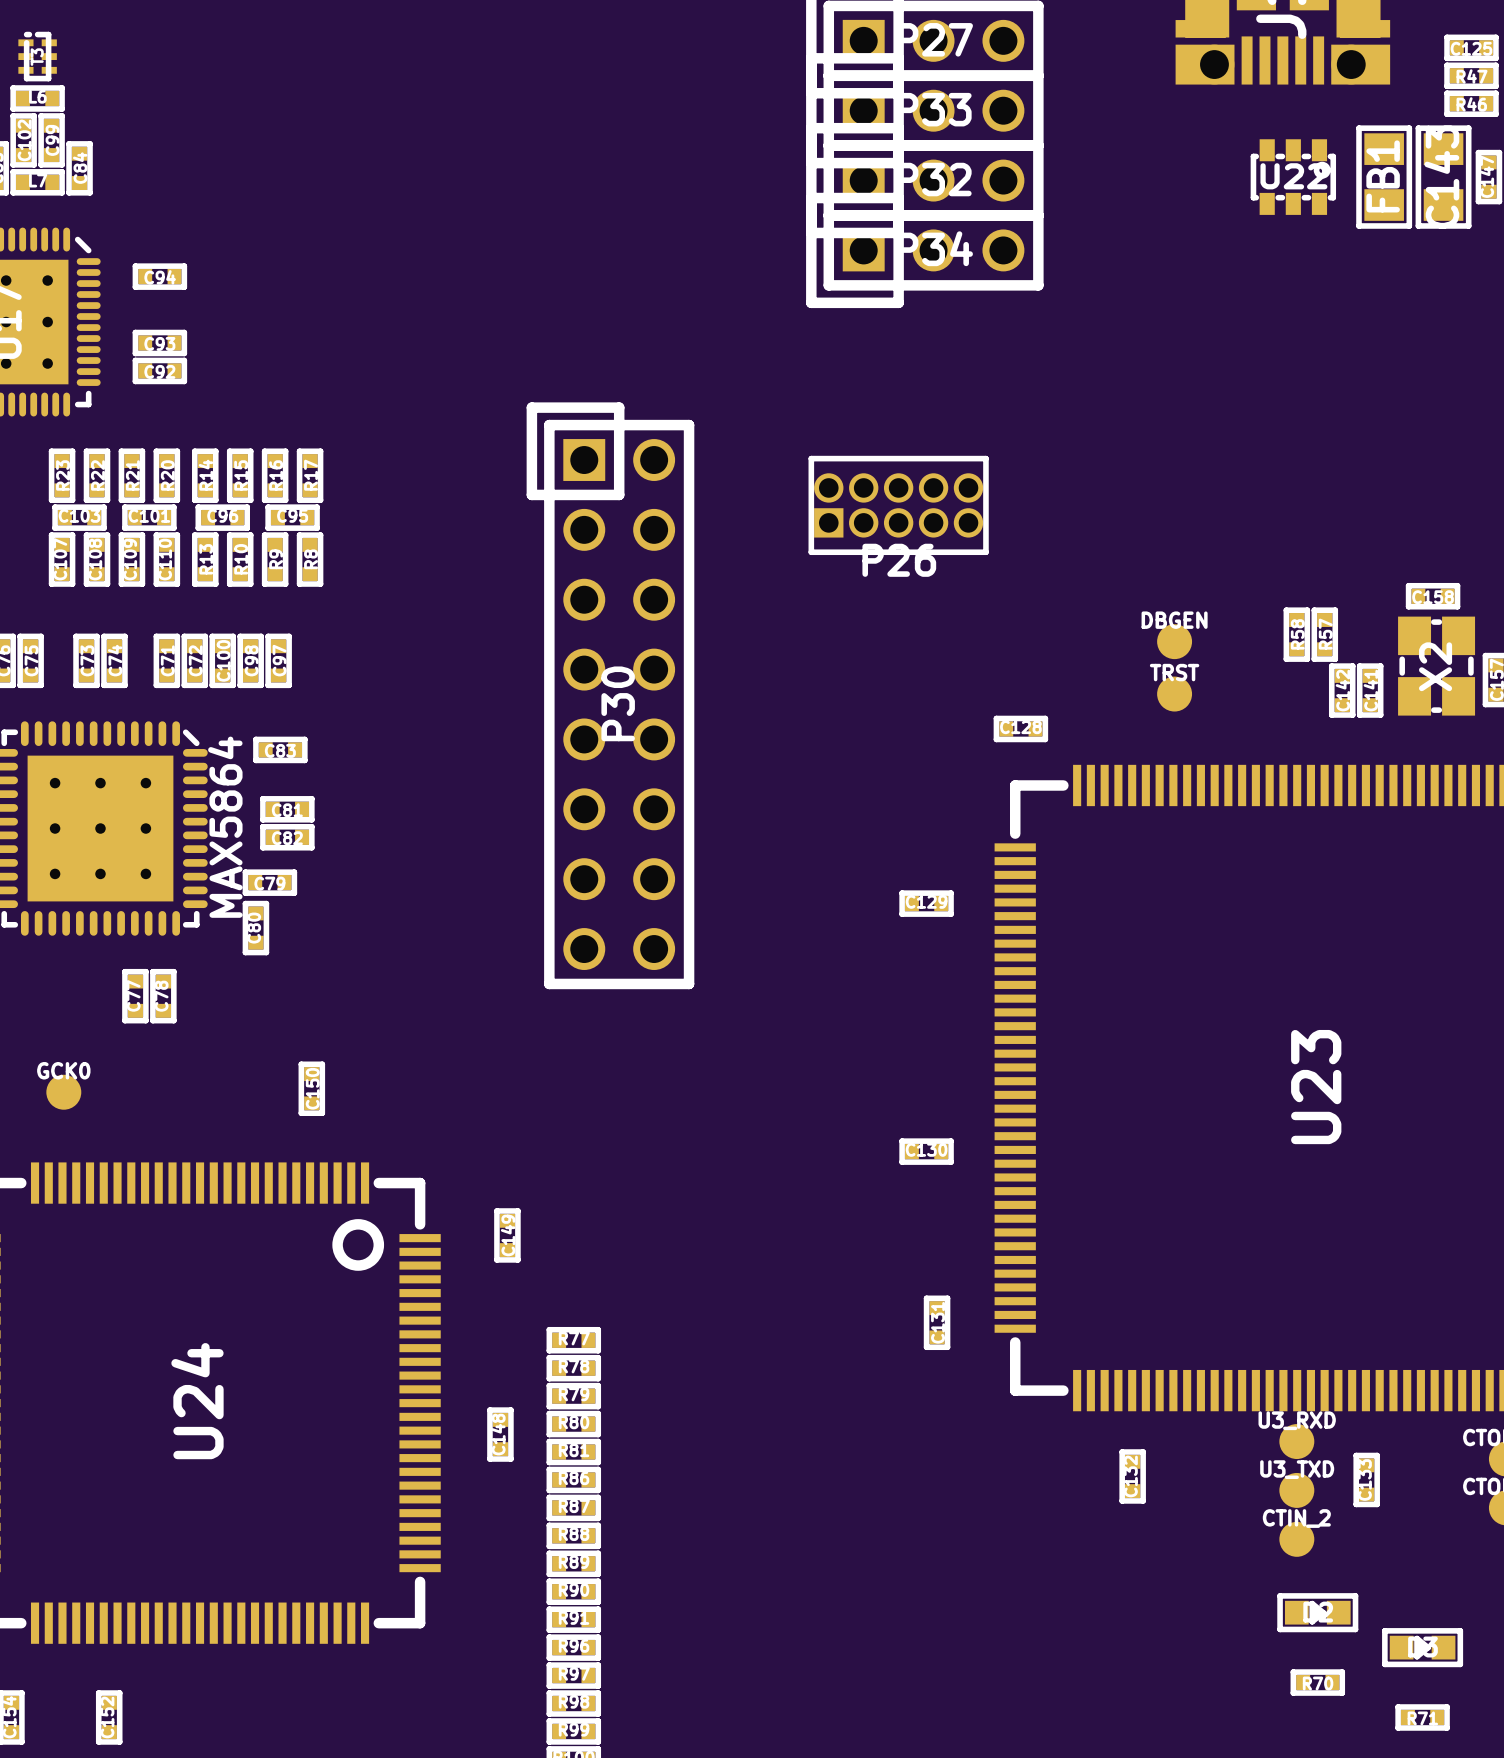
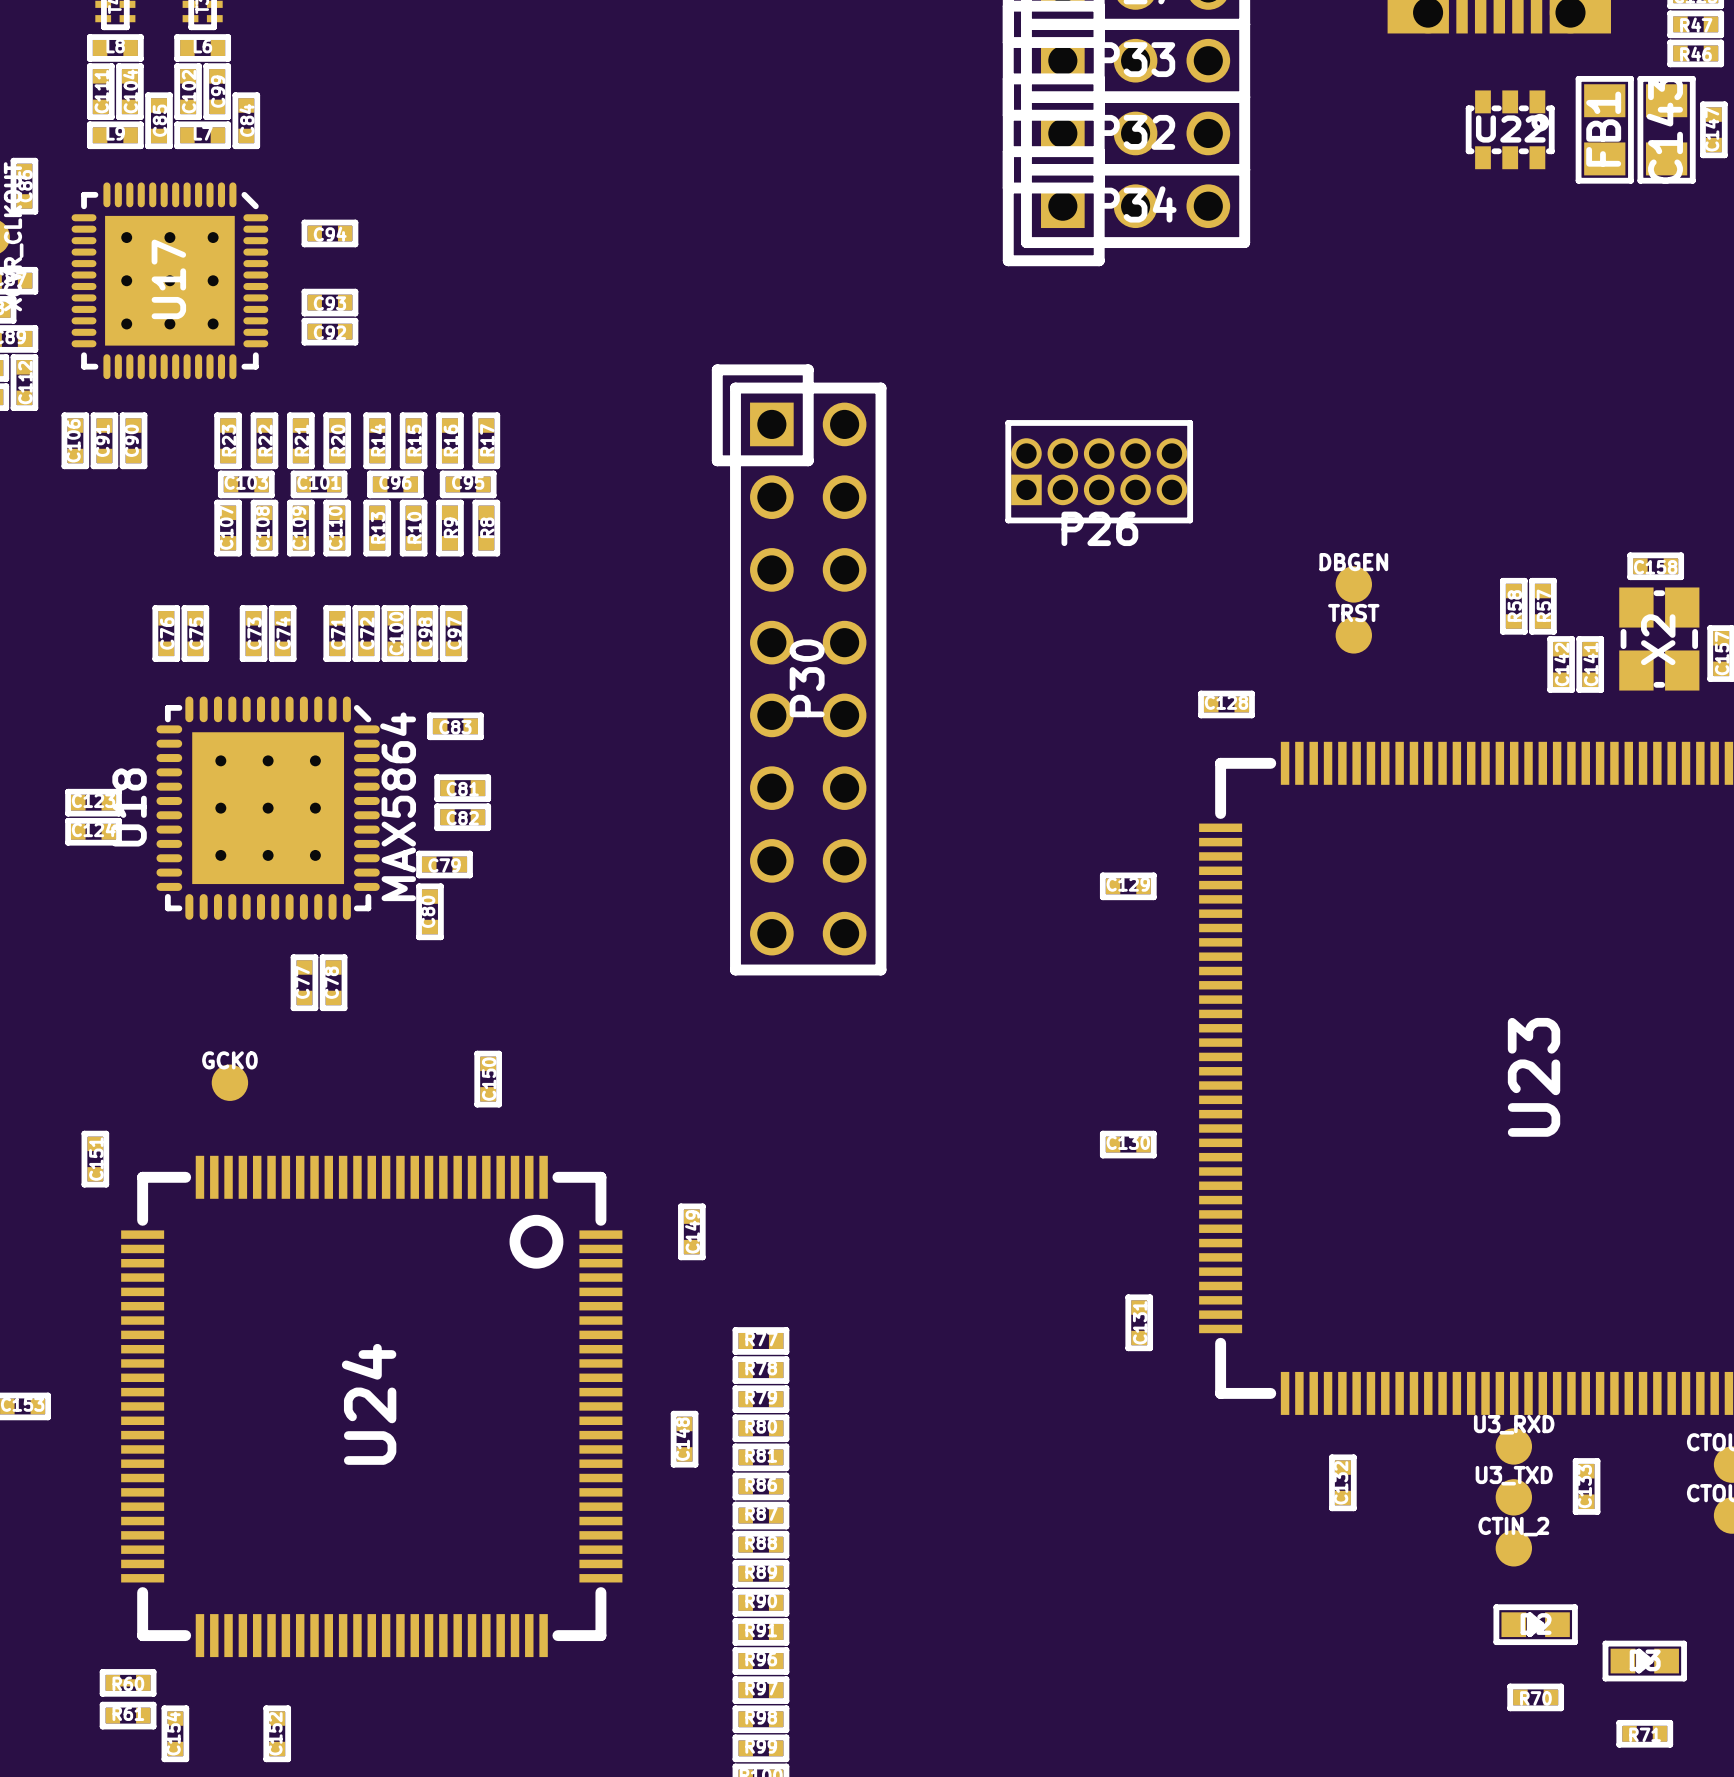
part position: (1174, 641) -> (1353, 584)
part position: (1174, 694) -> (1353, 635)

